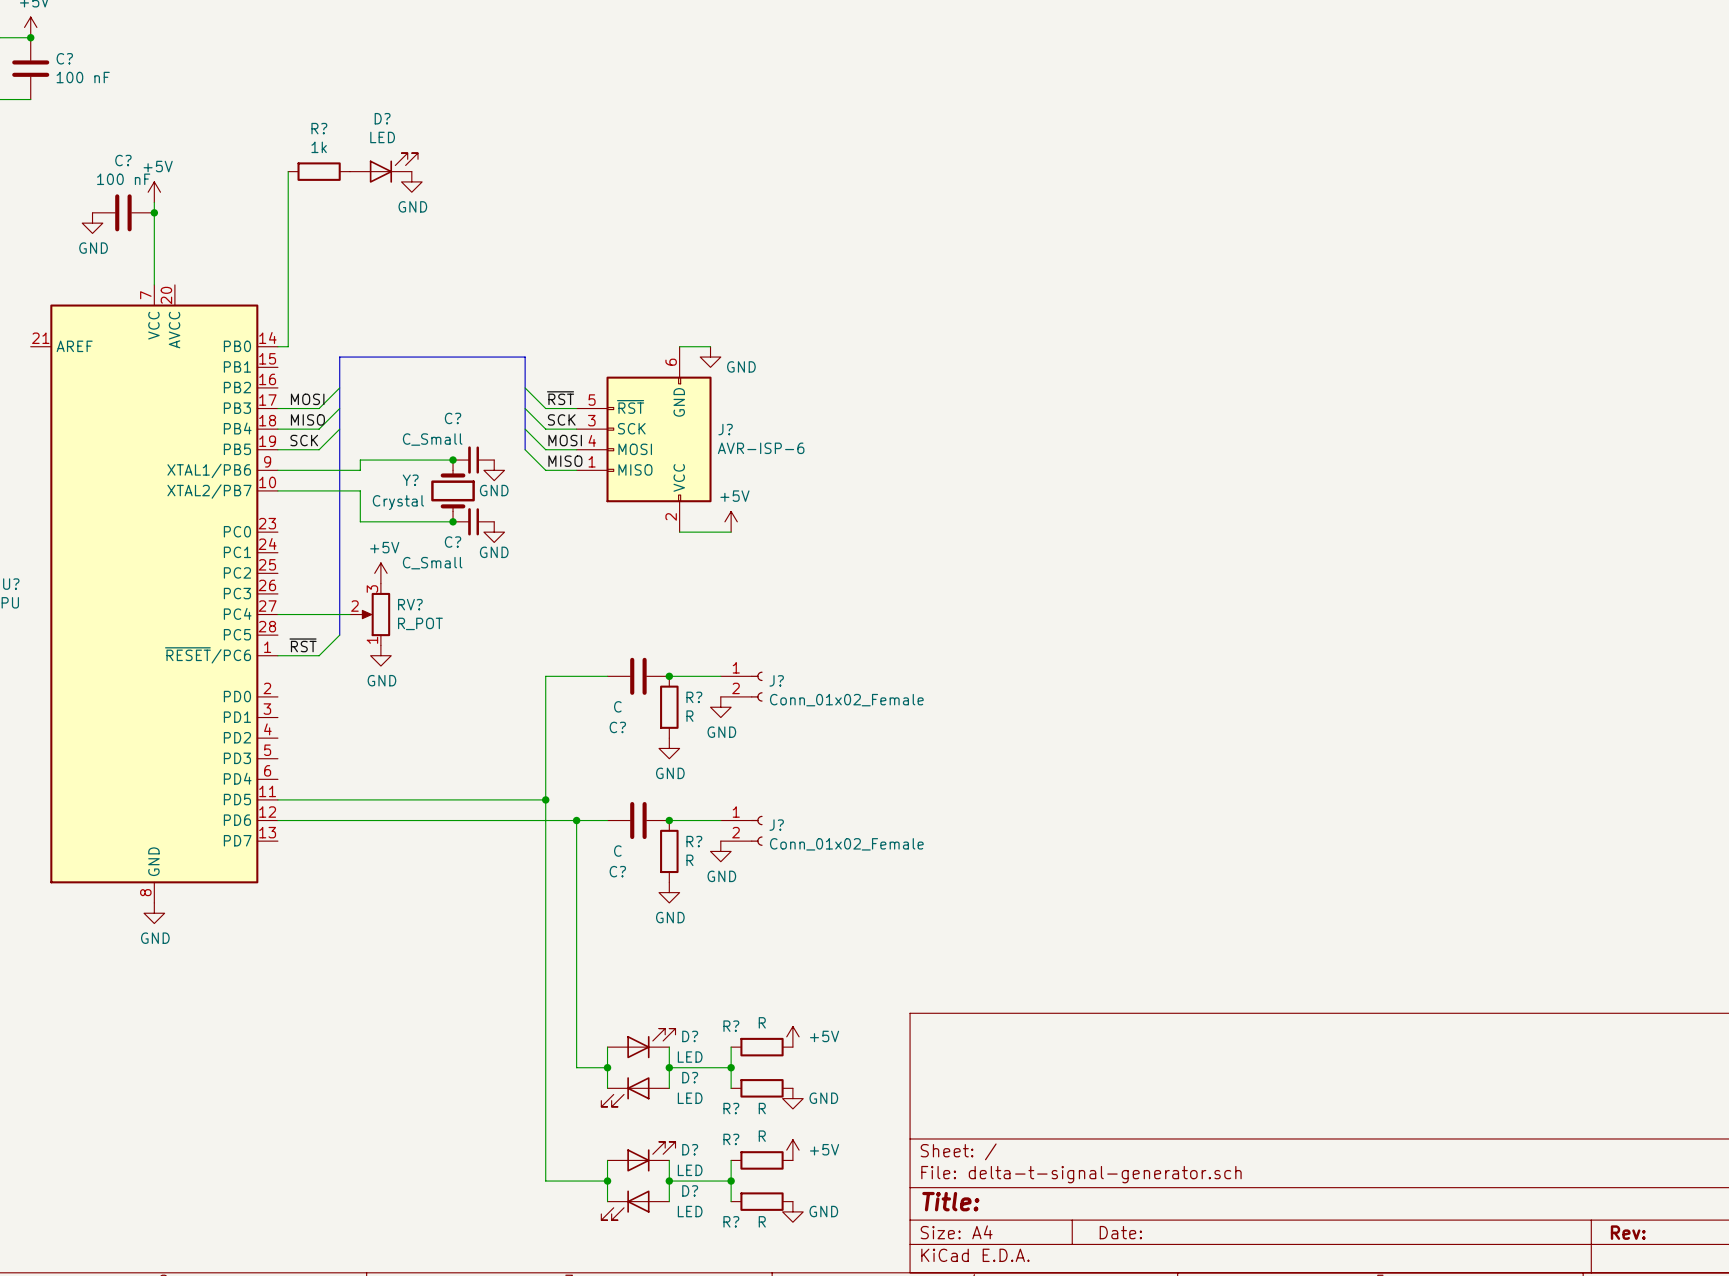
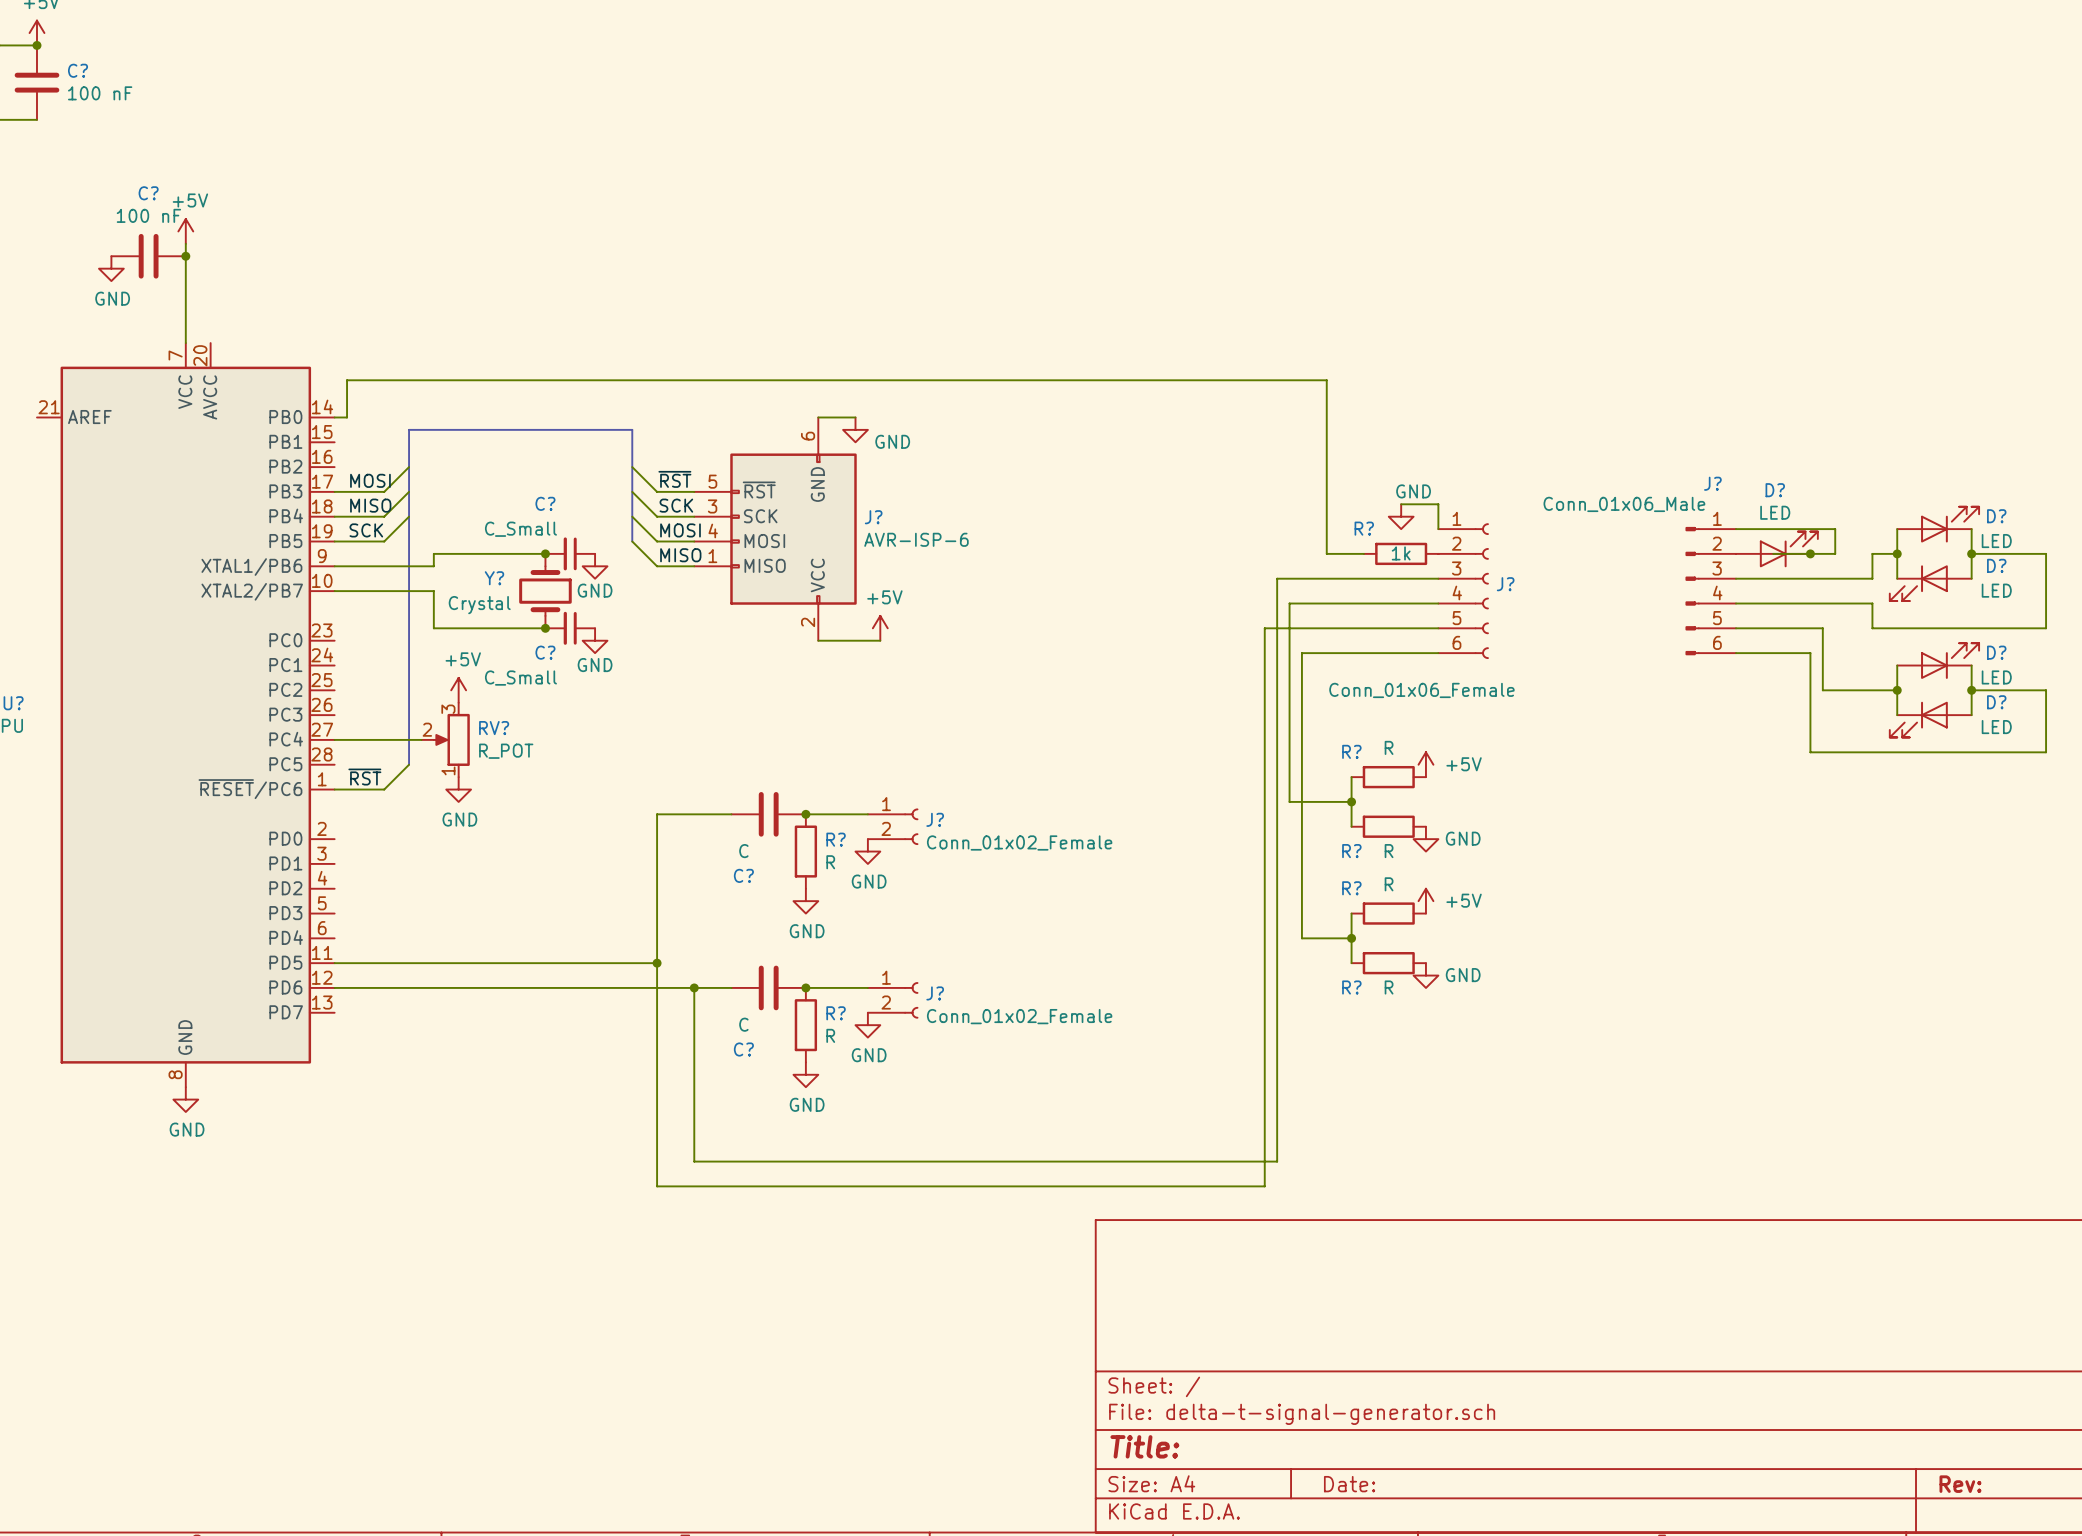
D?: LED (384, 167) -> none
wire: (288, 171) (288, 315) -> (1363, 553) (1326, 553) (1326, 380) (347, 380)
R?: 1k (319, 171) -> none
power symbol: GND (411, 181) -> none
wire: none -> (1401, 504) (1438, 504) (1438, 529)
power symbol: none -> GND (1401, 516)
D?: none -> LED (1938, 524)
wire: none -> (1736, 529) (1835, 529) (1835, 553) (1773, 553)
wire: none -> (1897, 529) (1897, 578)
wire: none -> (1971, 529) (1971, 578)
D?: none -> LED (1776, 549)
R?: none -> 1k (1401, 553)
junction: none -> (1810, 553)
wire: none -> (1897, 553) (1872, 553) (1872, 578) (1736, 578)
junction: none -> (1897, 553)
wire: none -> (1971, 553) (2046, 553) (2046, 628) (1872, 628) (1872, 603) (1736, 603)
junction: none -> (1971, 553)
D?: none -> LED (1930, 583)
J?: none -> Conn_01x06_Female (1463, 591)
J?: none -> Conn_01x06_Male (1710, 591)
wire: none -> (1438, 603) (1289, 603) (1289, 801) (1351, 801)
wire: none -> (1736, 628) (1822, 628) (1822, 690) (1897, 690)
wire: none -> (1438, 653) (1301, 653) (1301, 938) (1351, 938)
wire: none -> (1736, 653) (1810, 653) (1810, 752) (2046, 752) (2046, 690) (1971, 690)
D?: none -> LED (1938, 661)
wire: none -> (1897, 665) (1897, 715)
wire: none -> (1971, 665) (1971, 715)
junction: none -> (1897, 690)
junction: none -> (1971, 690)
D?: none -> LED (1930, 719)
power symbol: none -> +5V (1425, 764)
wire: none -> (1351, 777) (1351, 826)
R?: none -> R (1388, 777)
junction: none -> (1351, 801)
R?: none -> R (1388, 826)
power symbol: none -> GND (1425, 839)
power symbol: none -> +5V (1425, 901)
wire: none -> (1351, 913) (1351, 963)
R?: none -> R (1388, 913)
junction: none -> (1351, 938)
R?: none -> R (1388, 963)
power symbol: none -> GND (1425, 975)
wire: (576, 964) (576, 1067) (607, 1067) -> (694, 1161) (1277, 1161) (1277, 578) (1438, 578)
wire: (545, 985) (545, 1181) (607, 1181) -> (657, 1186) (1264, 1186) (1264, 628) (1438, 628)
power symbol: +5V (792, 1036) -> none
D?: LED (641, 1043) -> none
wire: (607, 1047) (607, 1088) -> none
wire: (669, 1047) (669, 1088) -> none
wire: (731, 1047) (731, 1088) -> none
R?: R (762, 1047) -> none
junction: (607, 1067) -> none
wire: (669, 1067) (731, 1067) -> none
junction: (669, 1067) -> none
junction: (731, 1067) -> none
R?: R (762, 1088) -> none
D?: LED (635, 1092) -> none
power symbol: GND (792, 1098) -> none
power symbol: +5V (792, 1150) -> none
D?: LED (641, 1156) -> none
wire: (607, 1160) (607, 1201) -> none
wire: (669, 1160) (669, 1201) -> none
wire: (731, 1160) (731, 1201) -> none
R?: R (762, 1160) -> none
junction: (607, 1181) -> none
wire: (669, 1181) (731, 1181) -> none
junction: (669, 1181) -> none
junction: (731, 1181) -> none
R?: R (762, 1201) -> none
D?: LED (635, 1205) -> none
power symbol: GND (792, 1211) -> none

